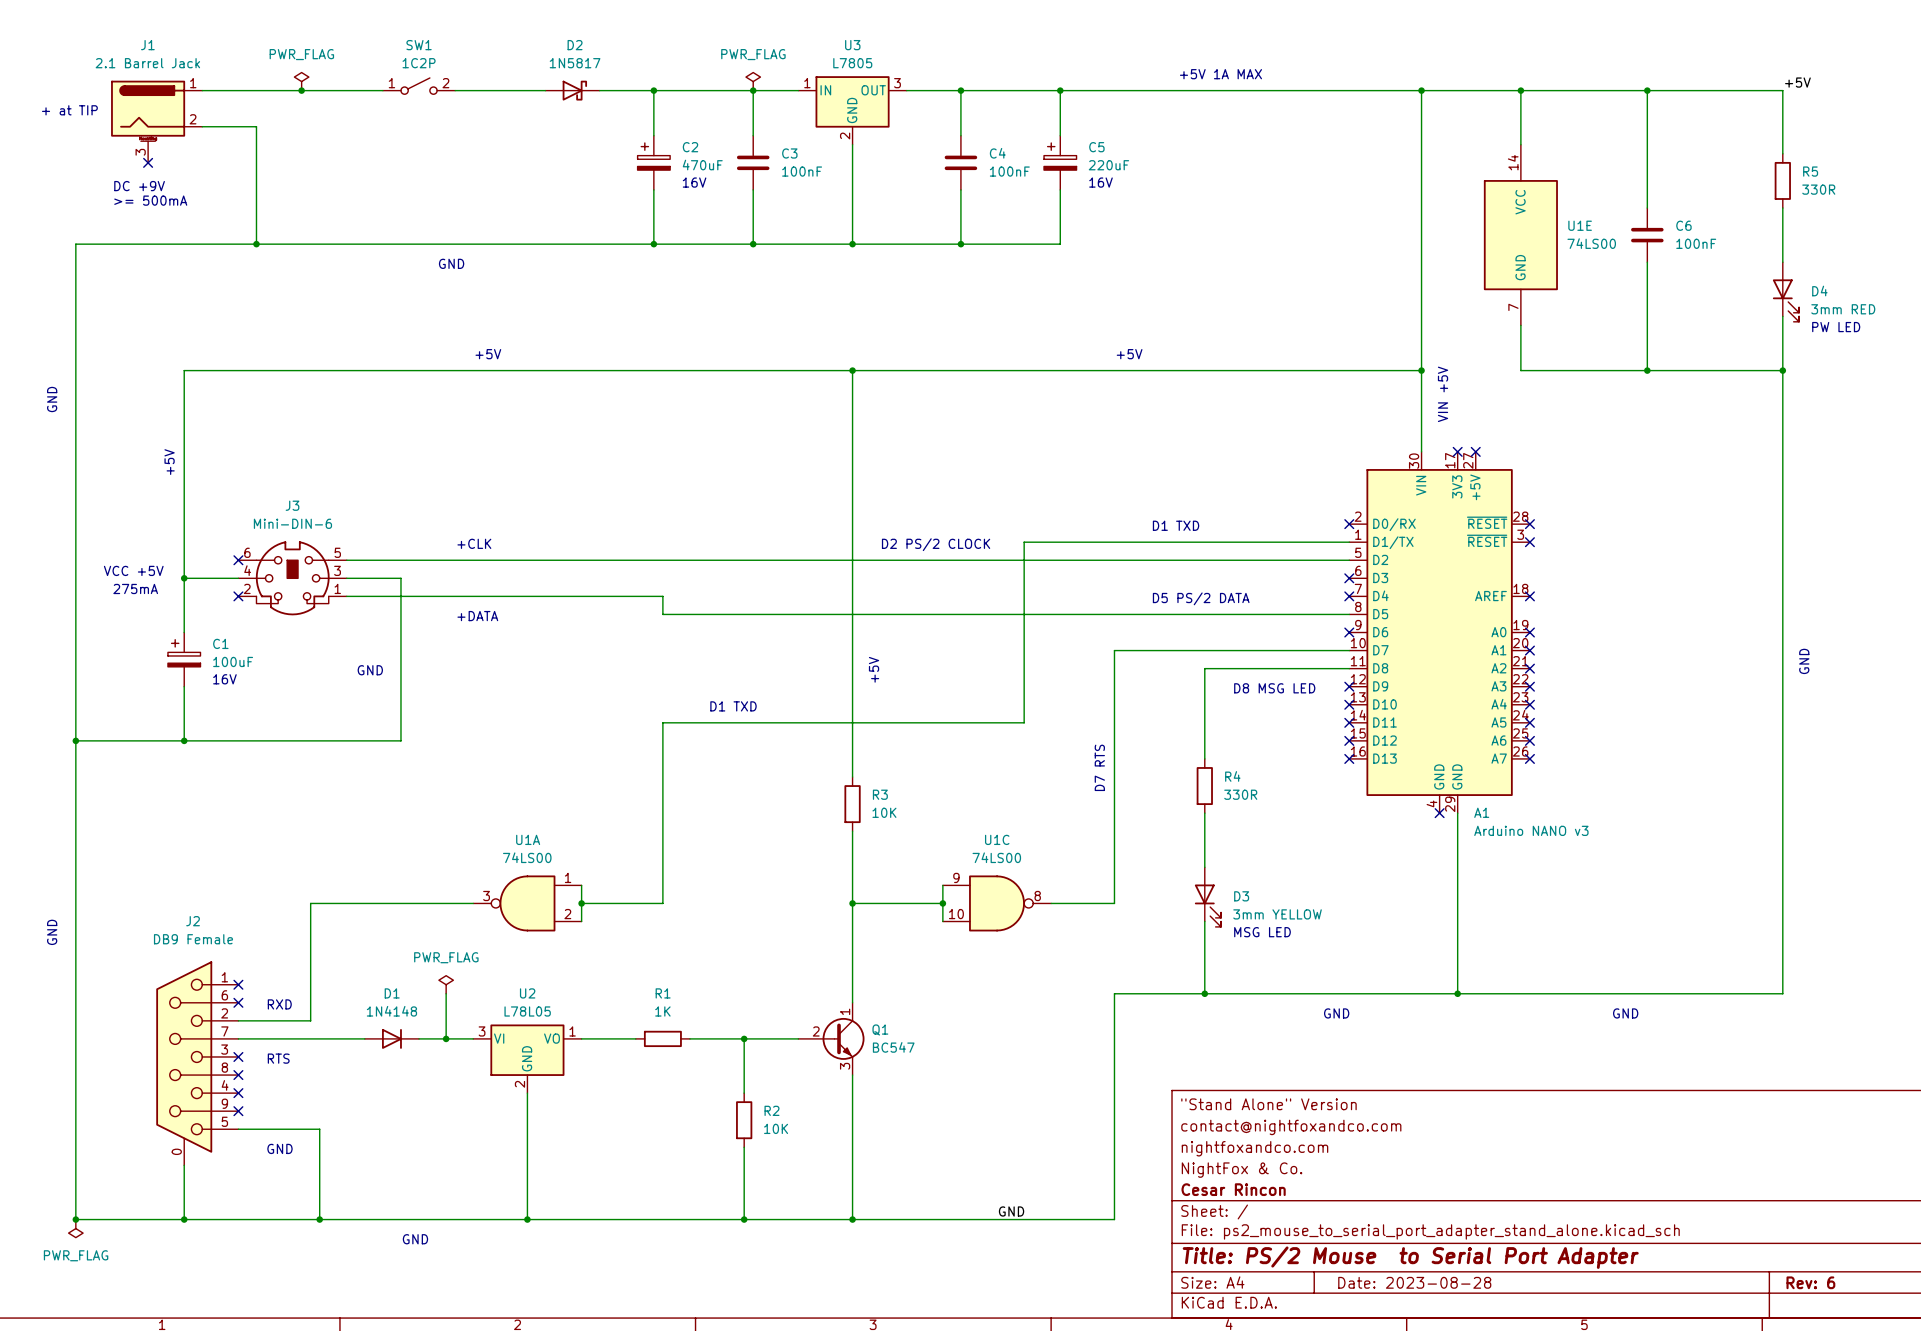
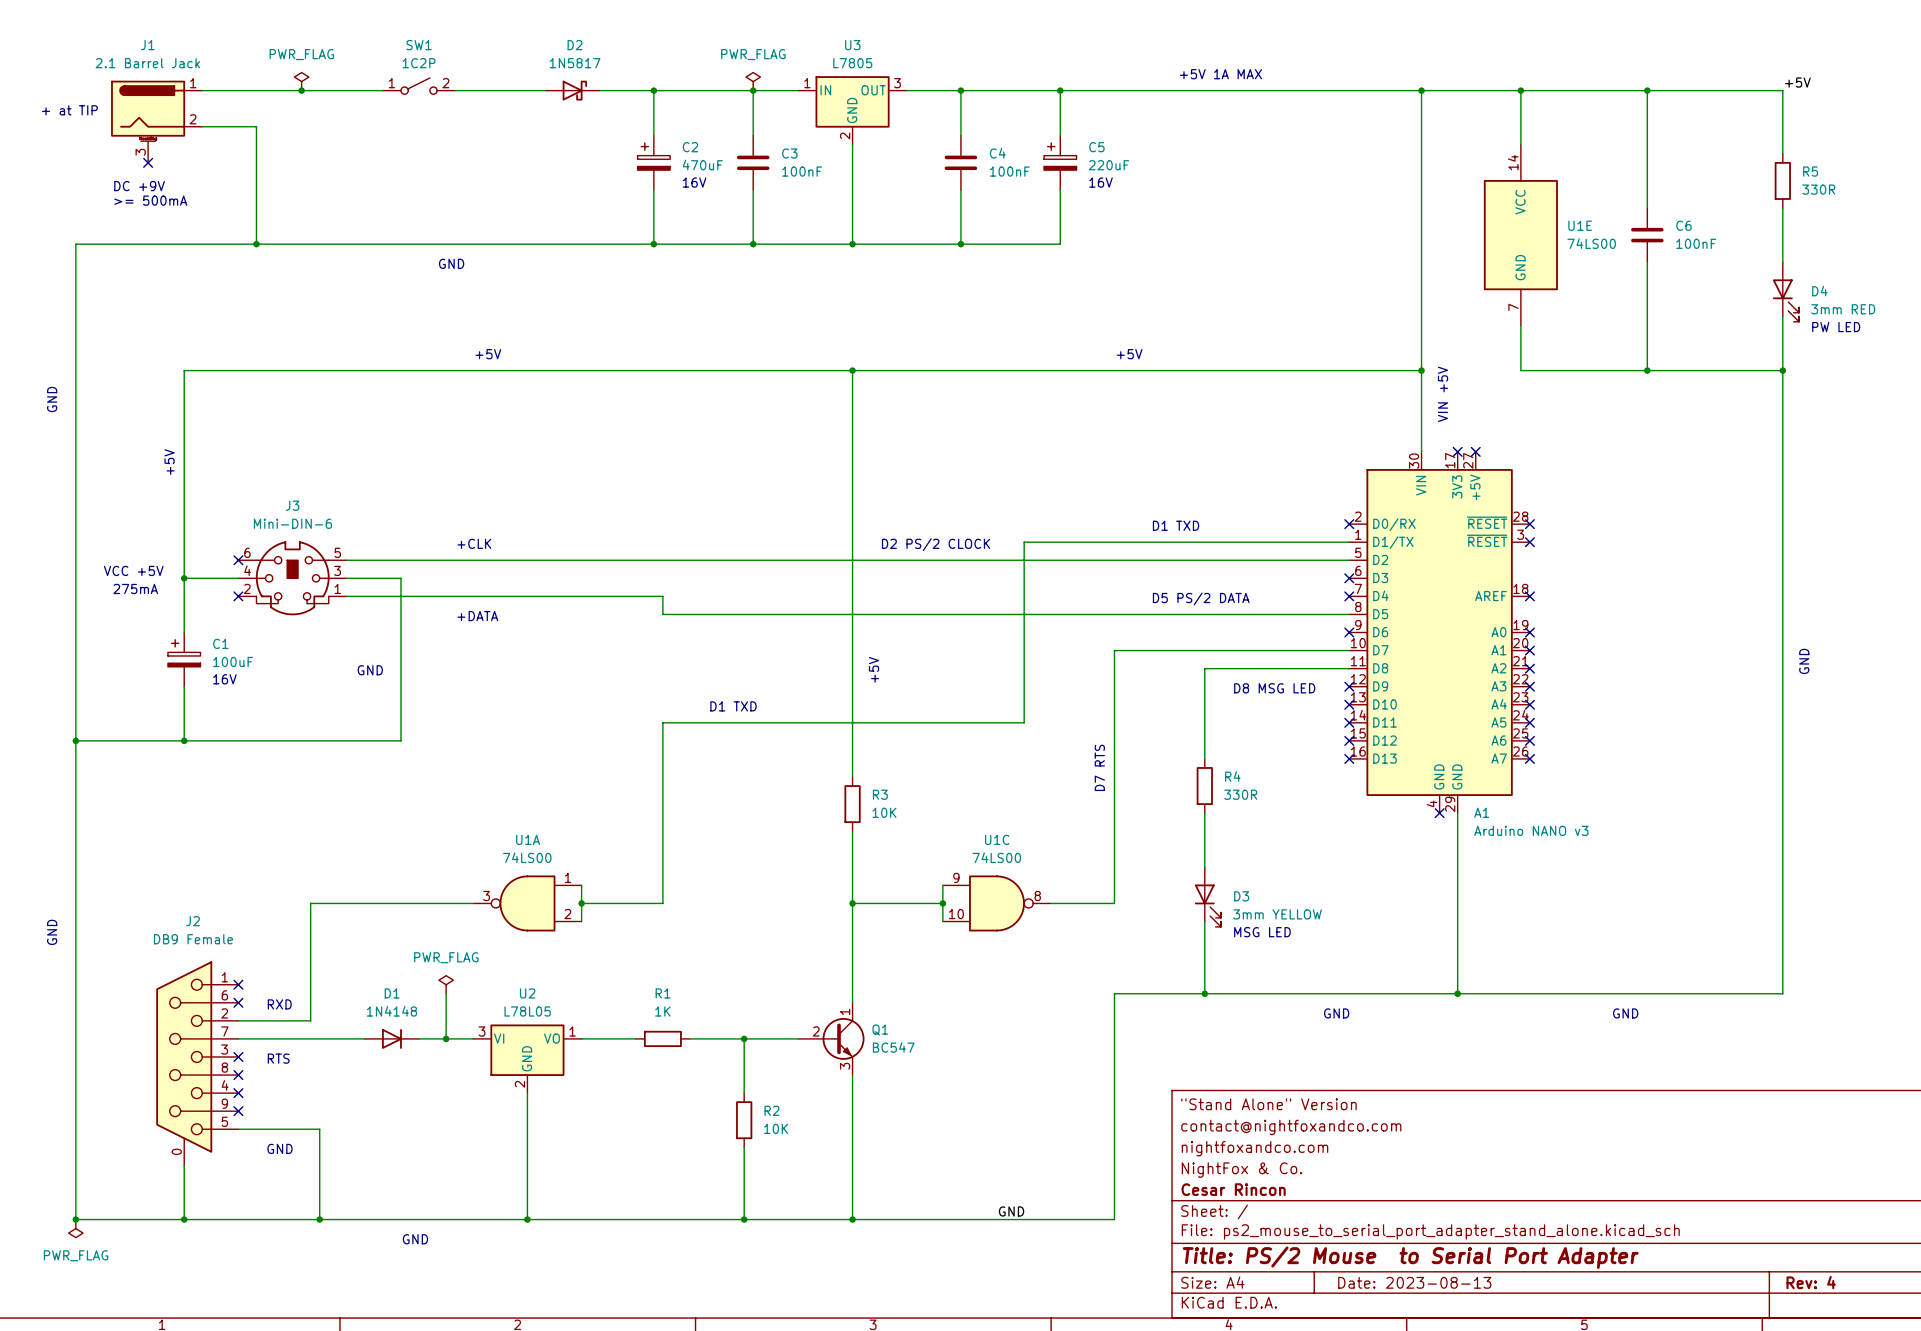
title block: Date: 2023-08-28 (1414, 1282) -> Date: 2023-08-13 (1414, 1282)
title block: Rev: 6 (1810, 1282) -> Rev: 4 (1811, 1282)

